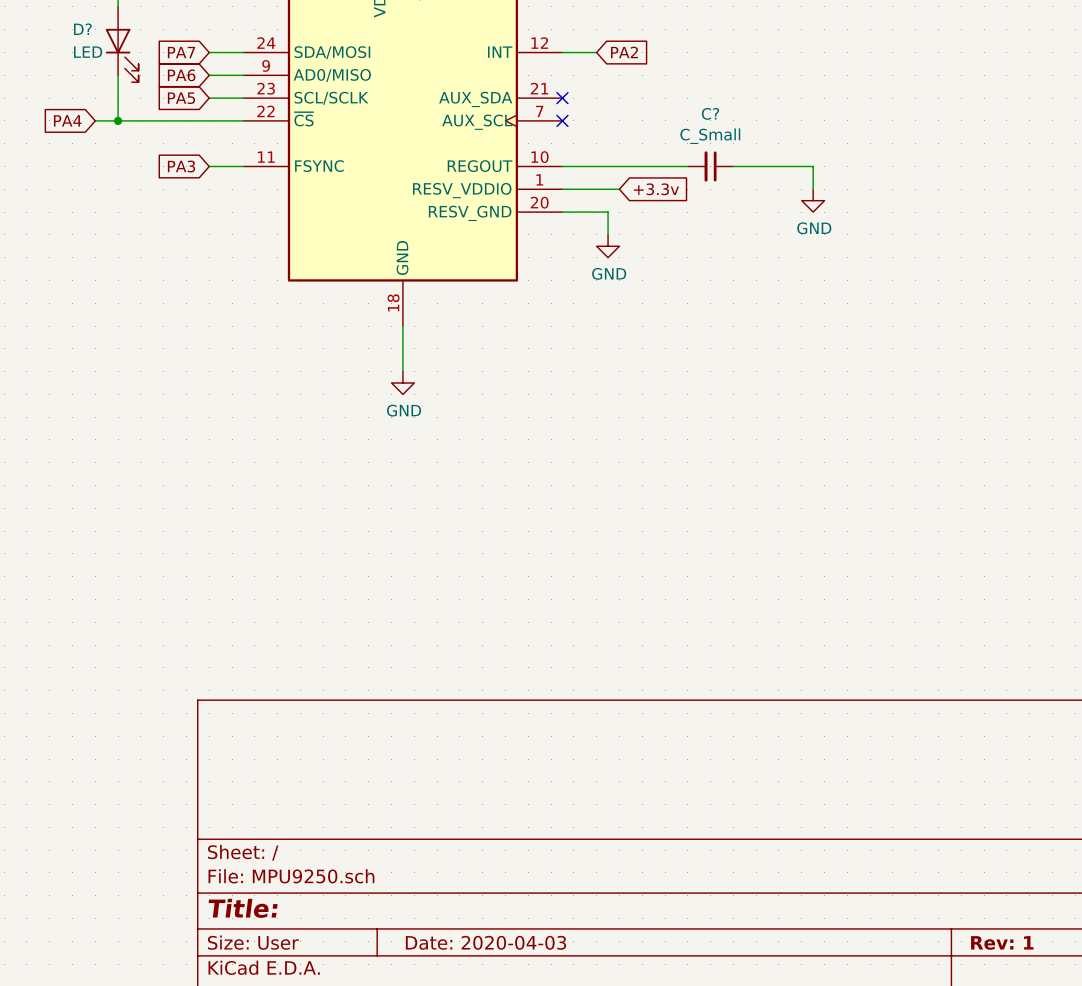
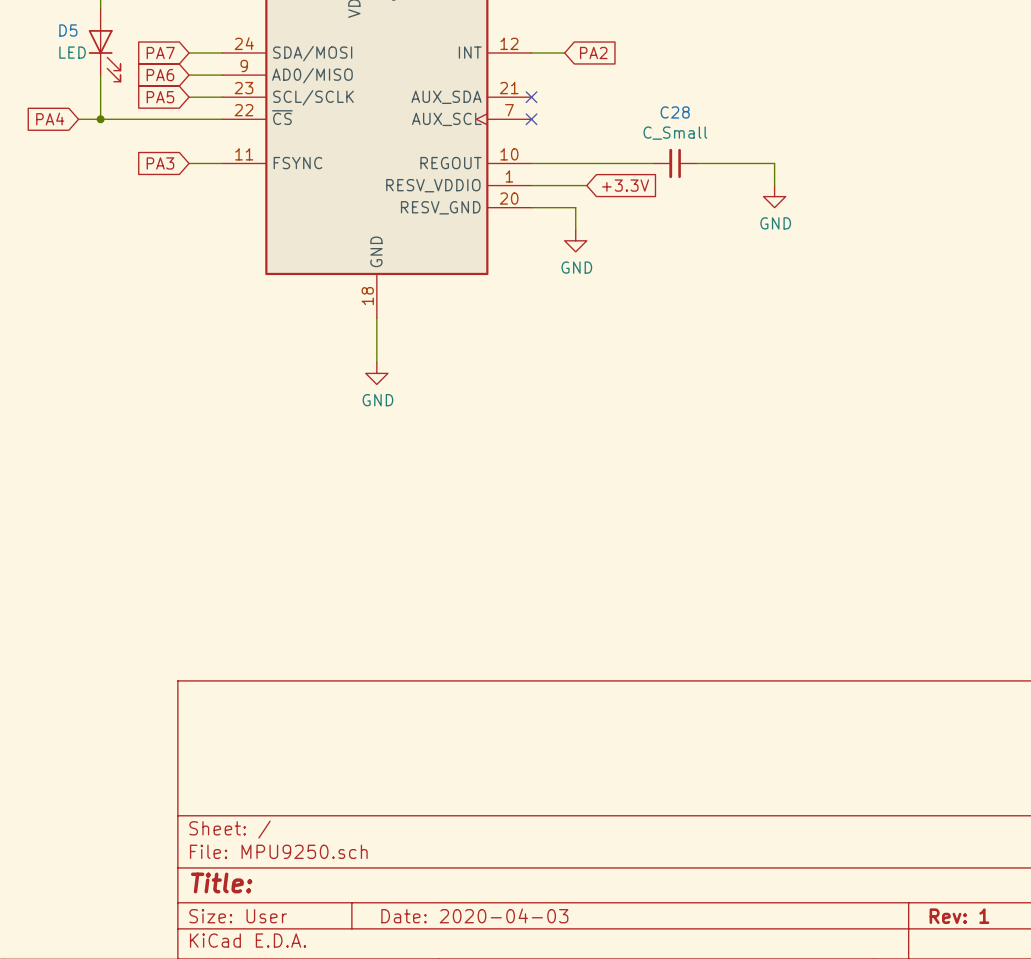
D? name: D? (82, 29) -> D5 (68, 30)
C? name: C? (710, 113) -> C28 (675, 112)
global label: +3.3v (656, 189) -> +3.3V (625, 185)

